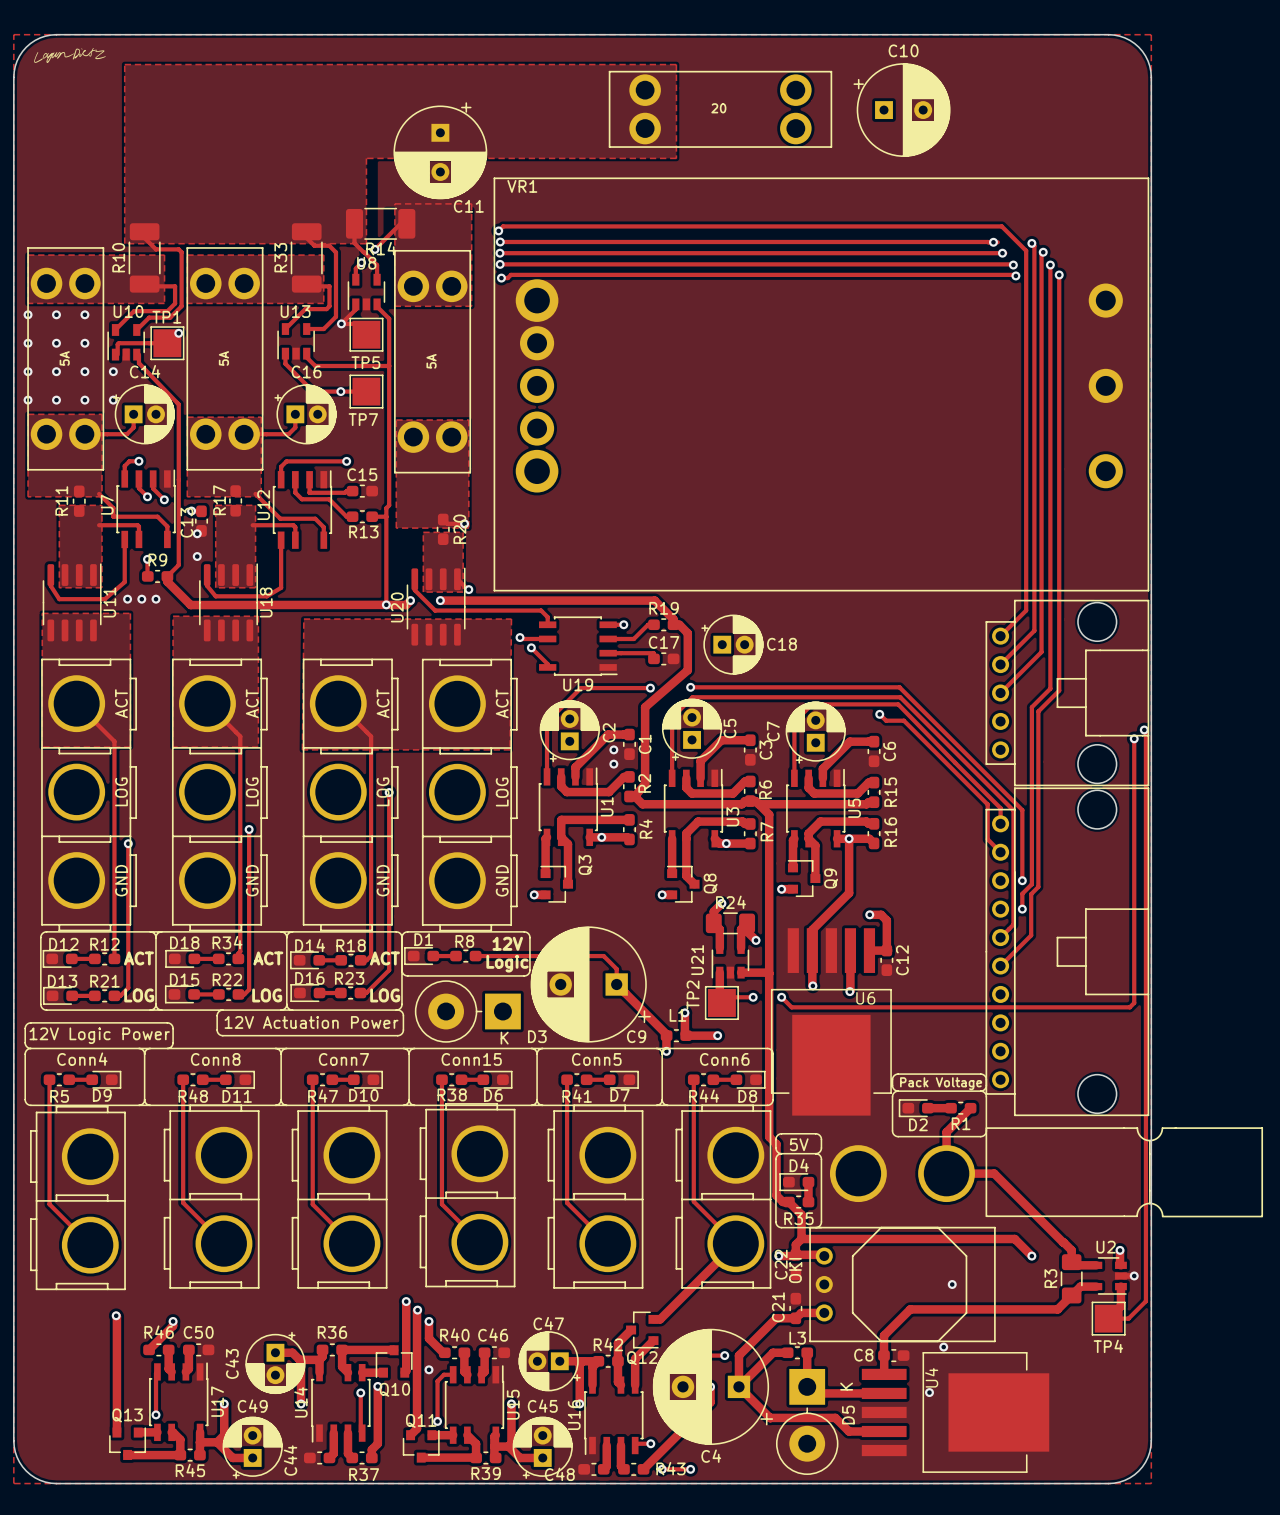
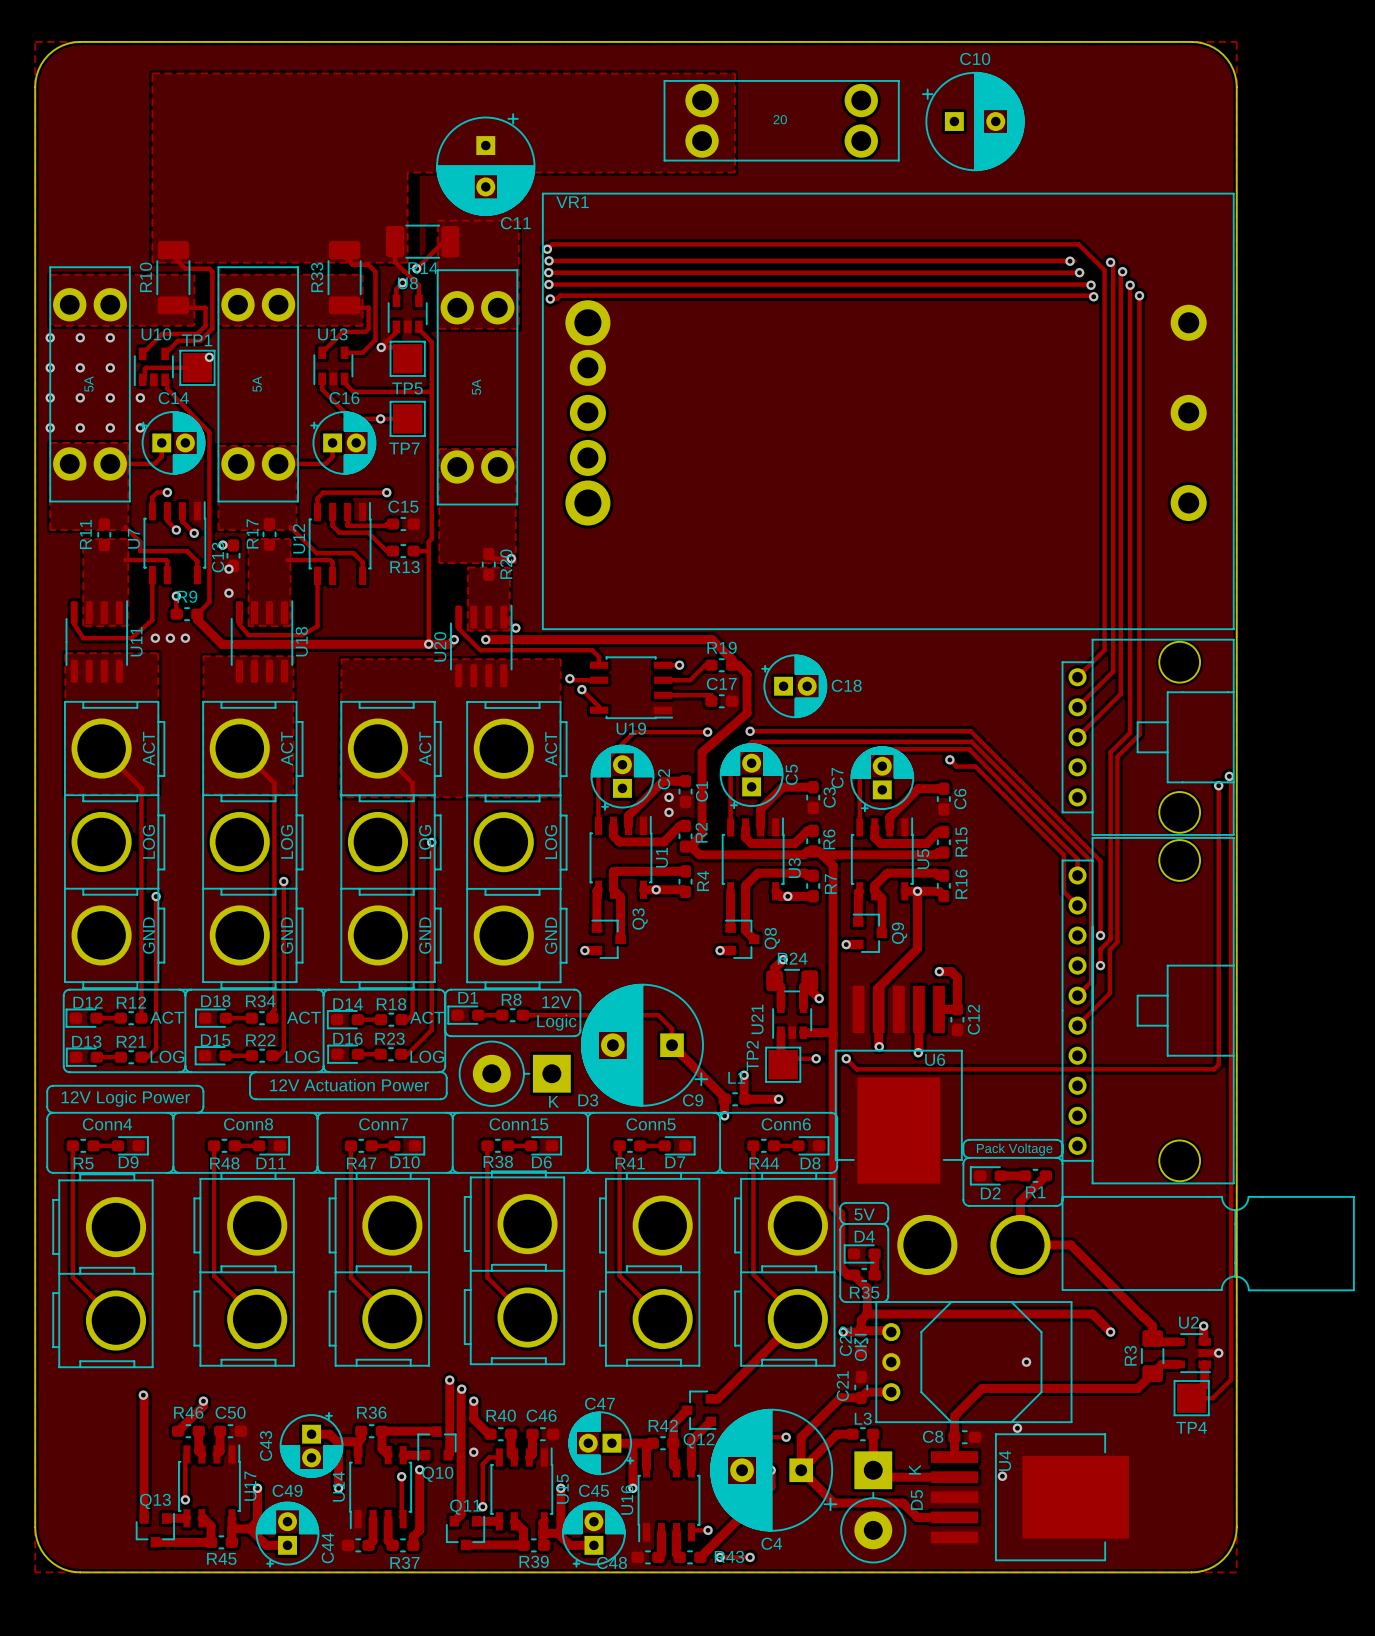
drawing: [34, 48, 106, 63] -> none

